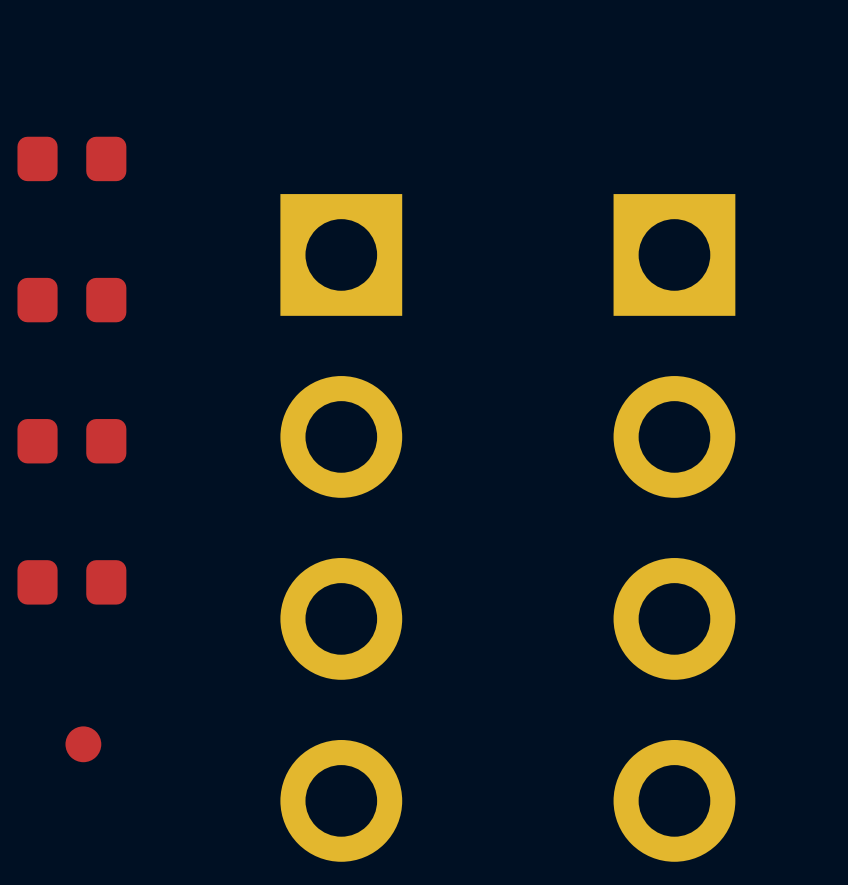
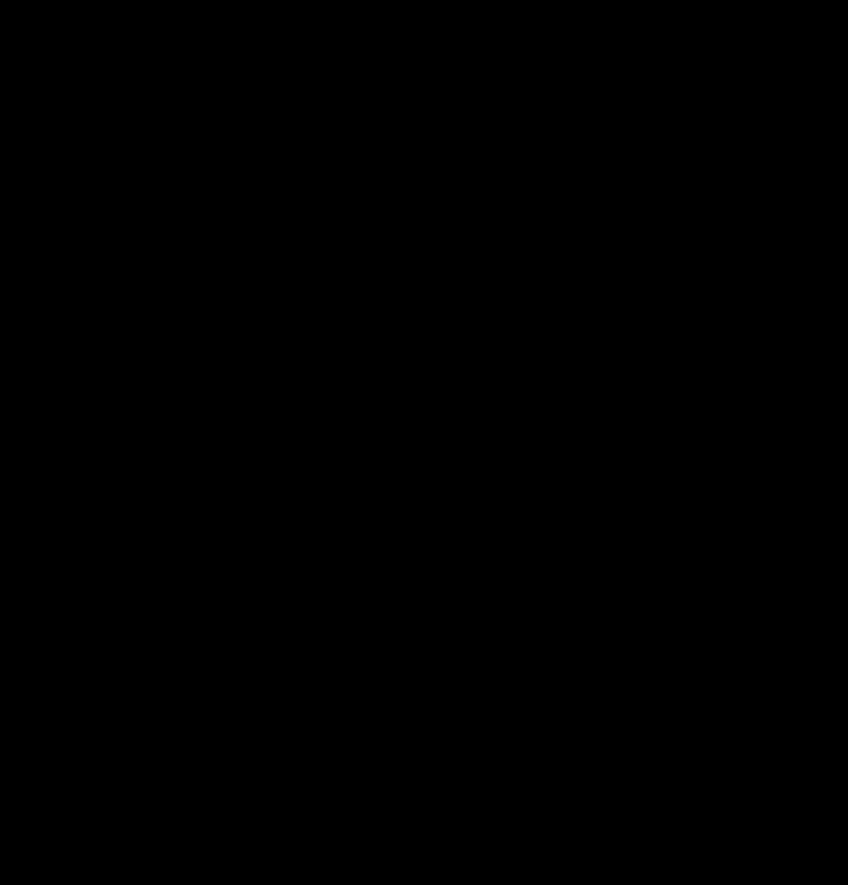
part: (71, 158) -> none
part: (71, 300) -> none
part: (71, 441) -> none
part: (341, 527) -> none
part: (674, 527) -> none
part: (71, 582) -> none
part: (83, 744) -> none

